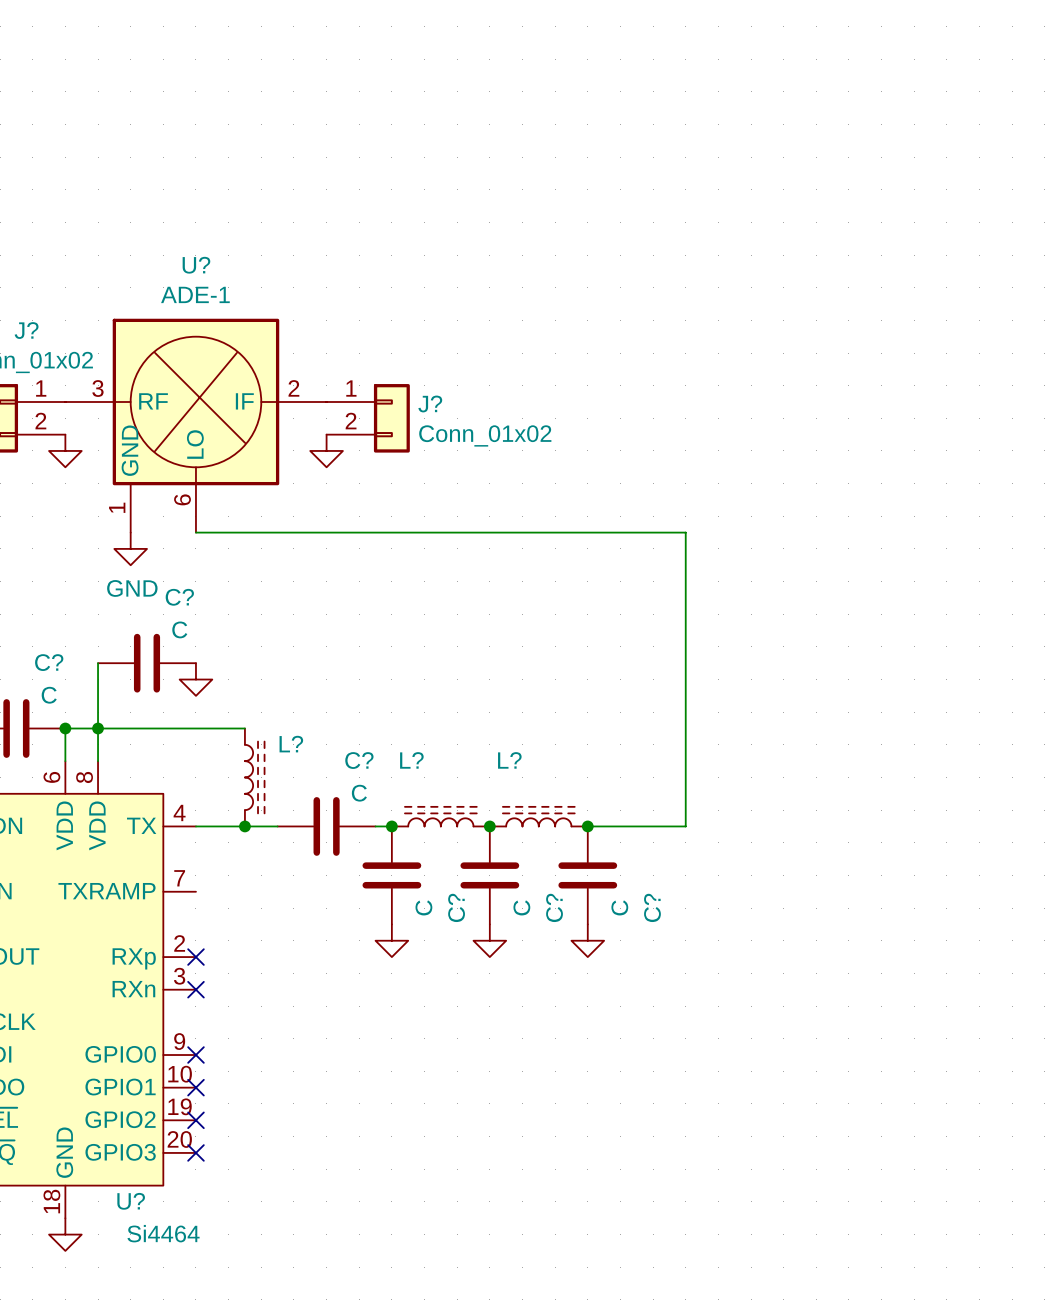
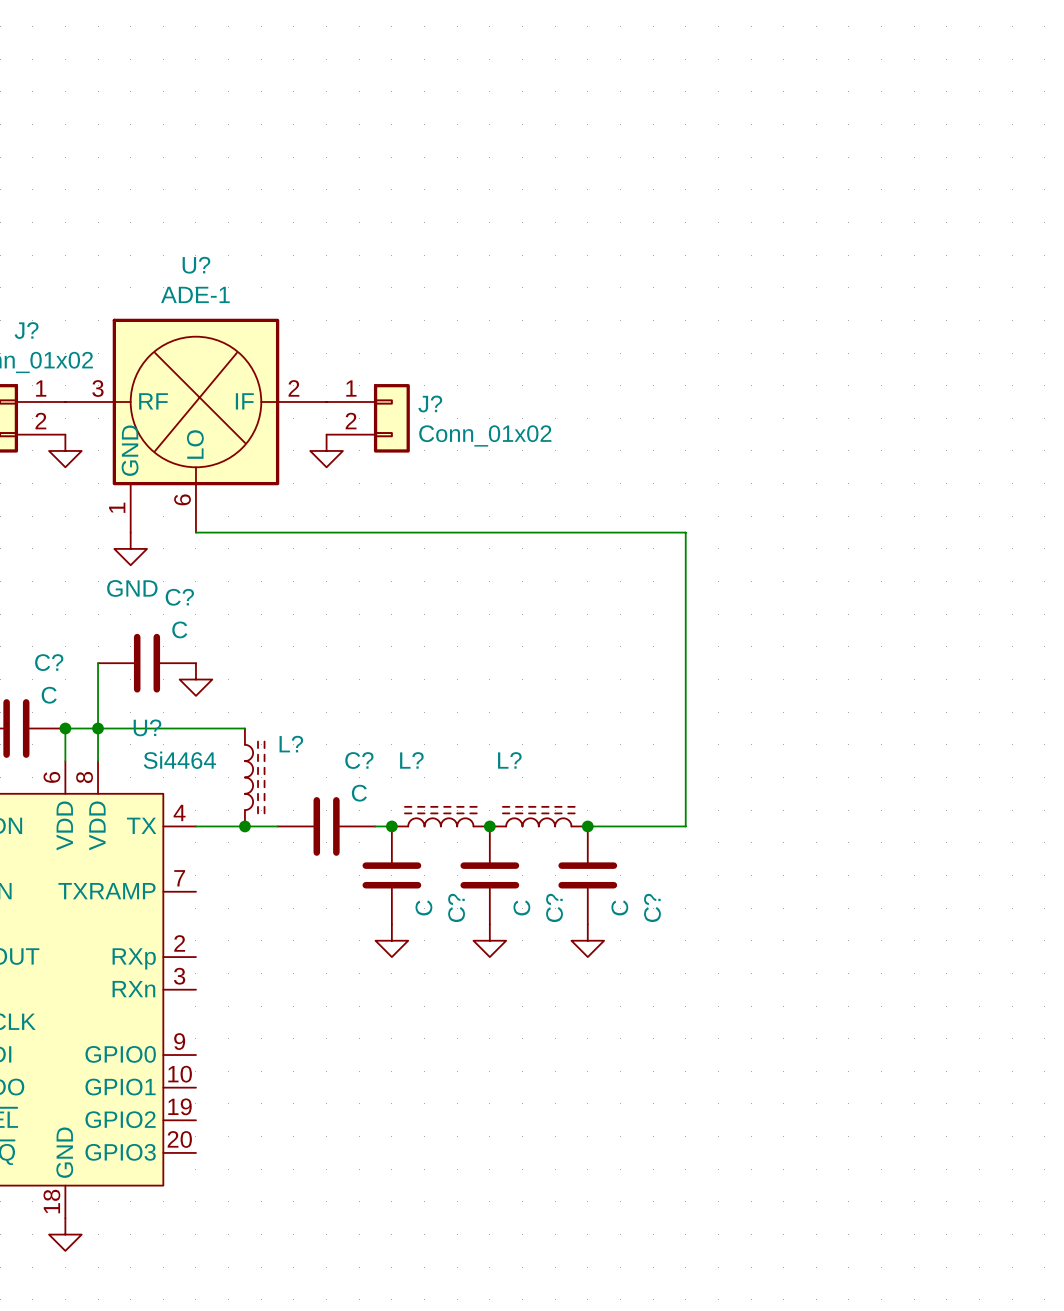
no-connect mark: (195, 957) -> none
no-connect mark: (195, 989) -> none
no-connect mark: (195, 1055) -> none
no-connect mark: (195, 1087) -> none
no-connect mark: (195, 1120) -> none
no-connect mark: (195, 1152) -> none
U? name position: U? (131, 1201) -> U? (147, 727)
U? value position: Si4464 (163, 1233) -> Si4464 (179, 760)

